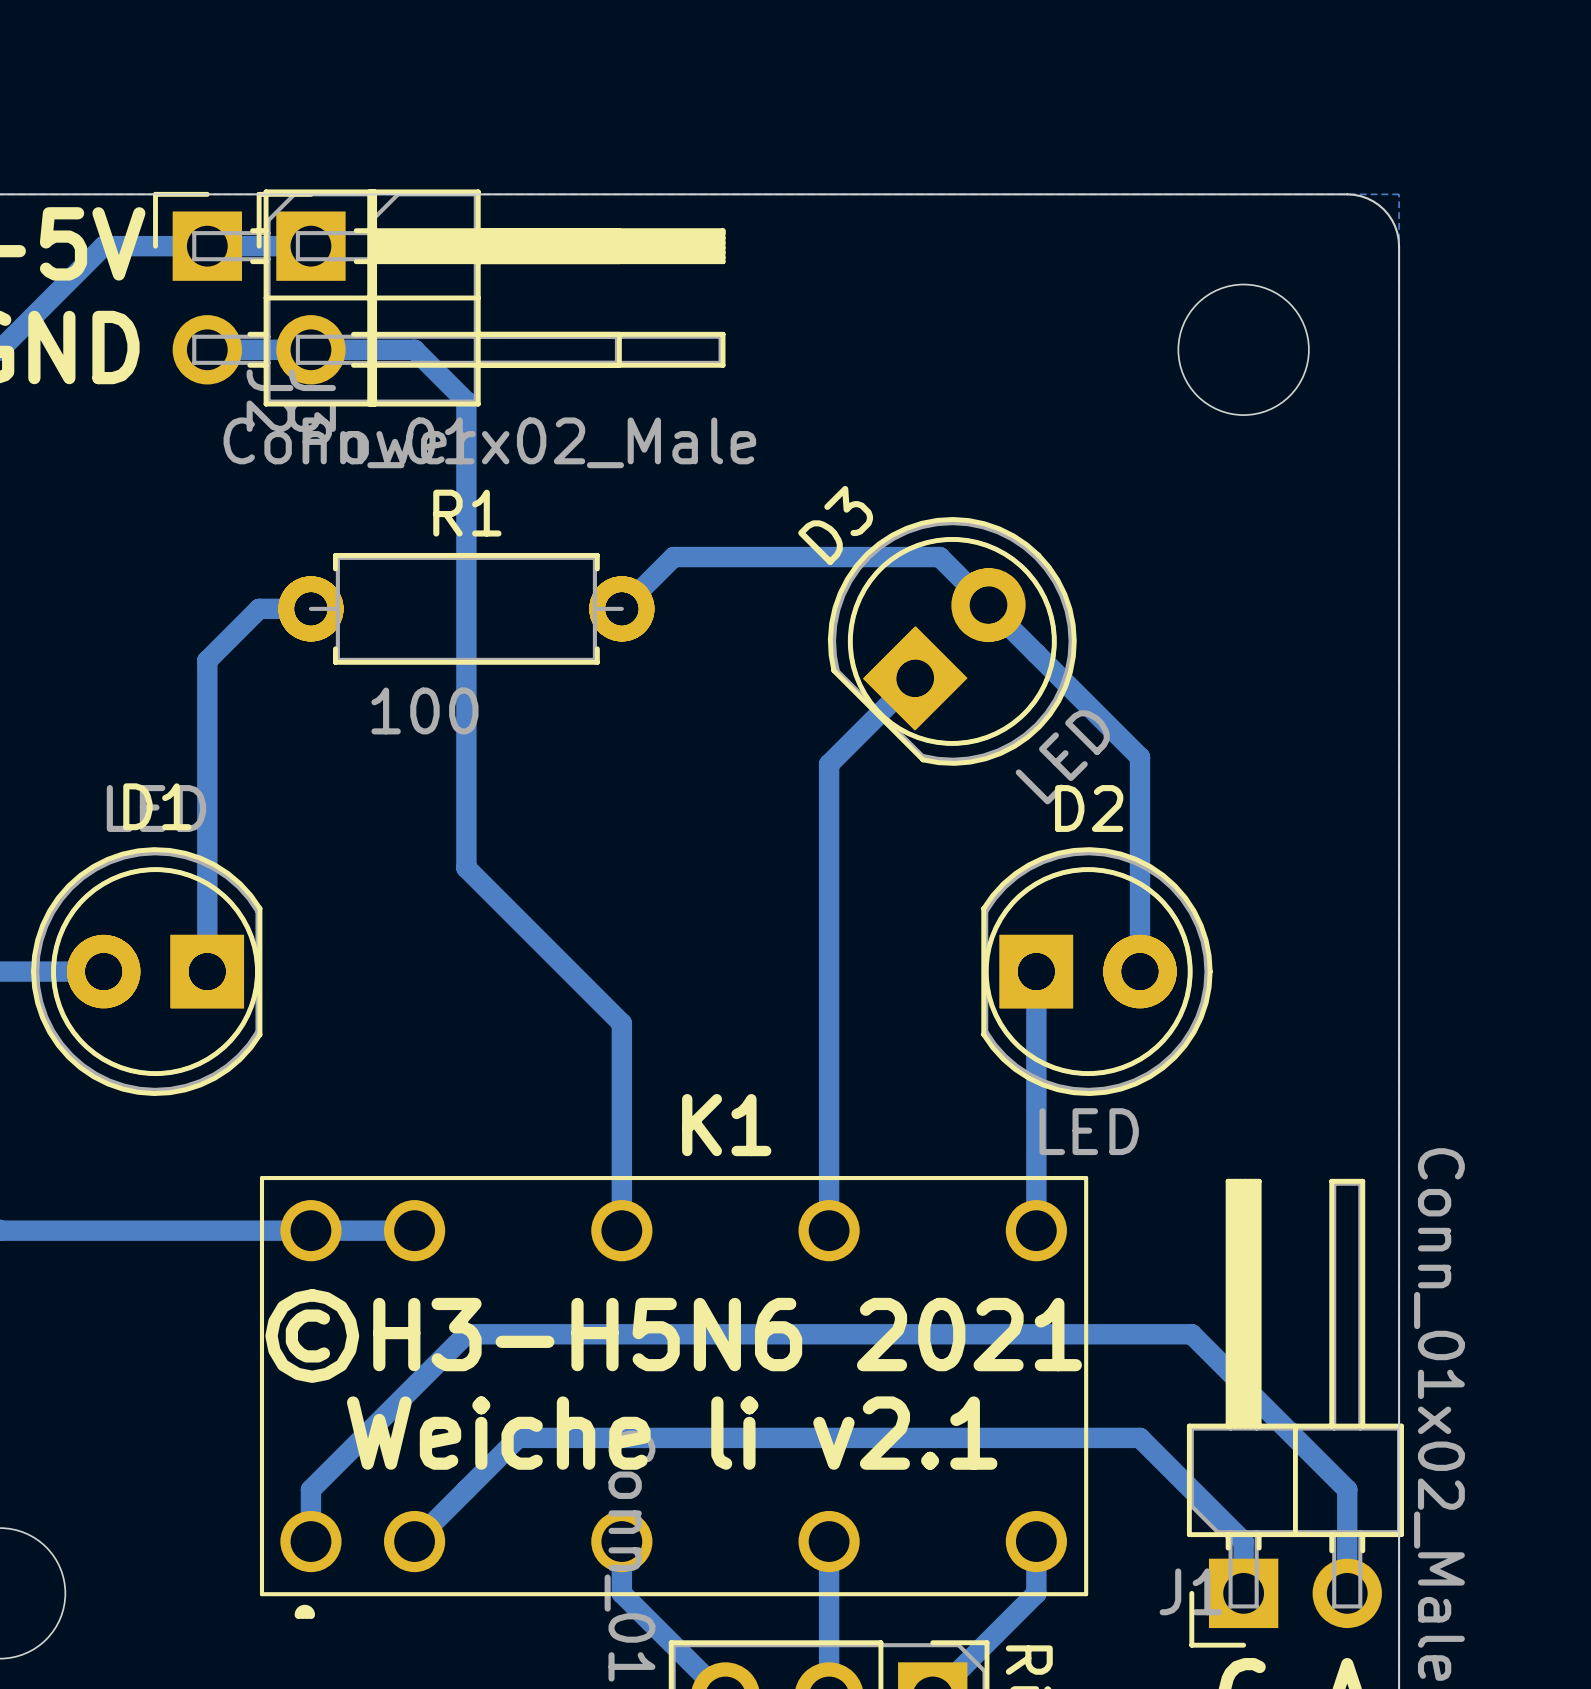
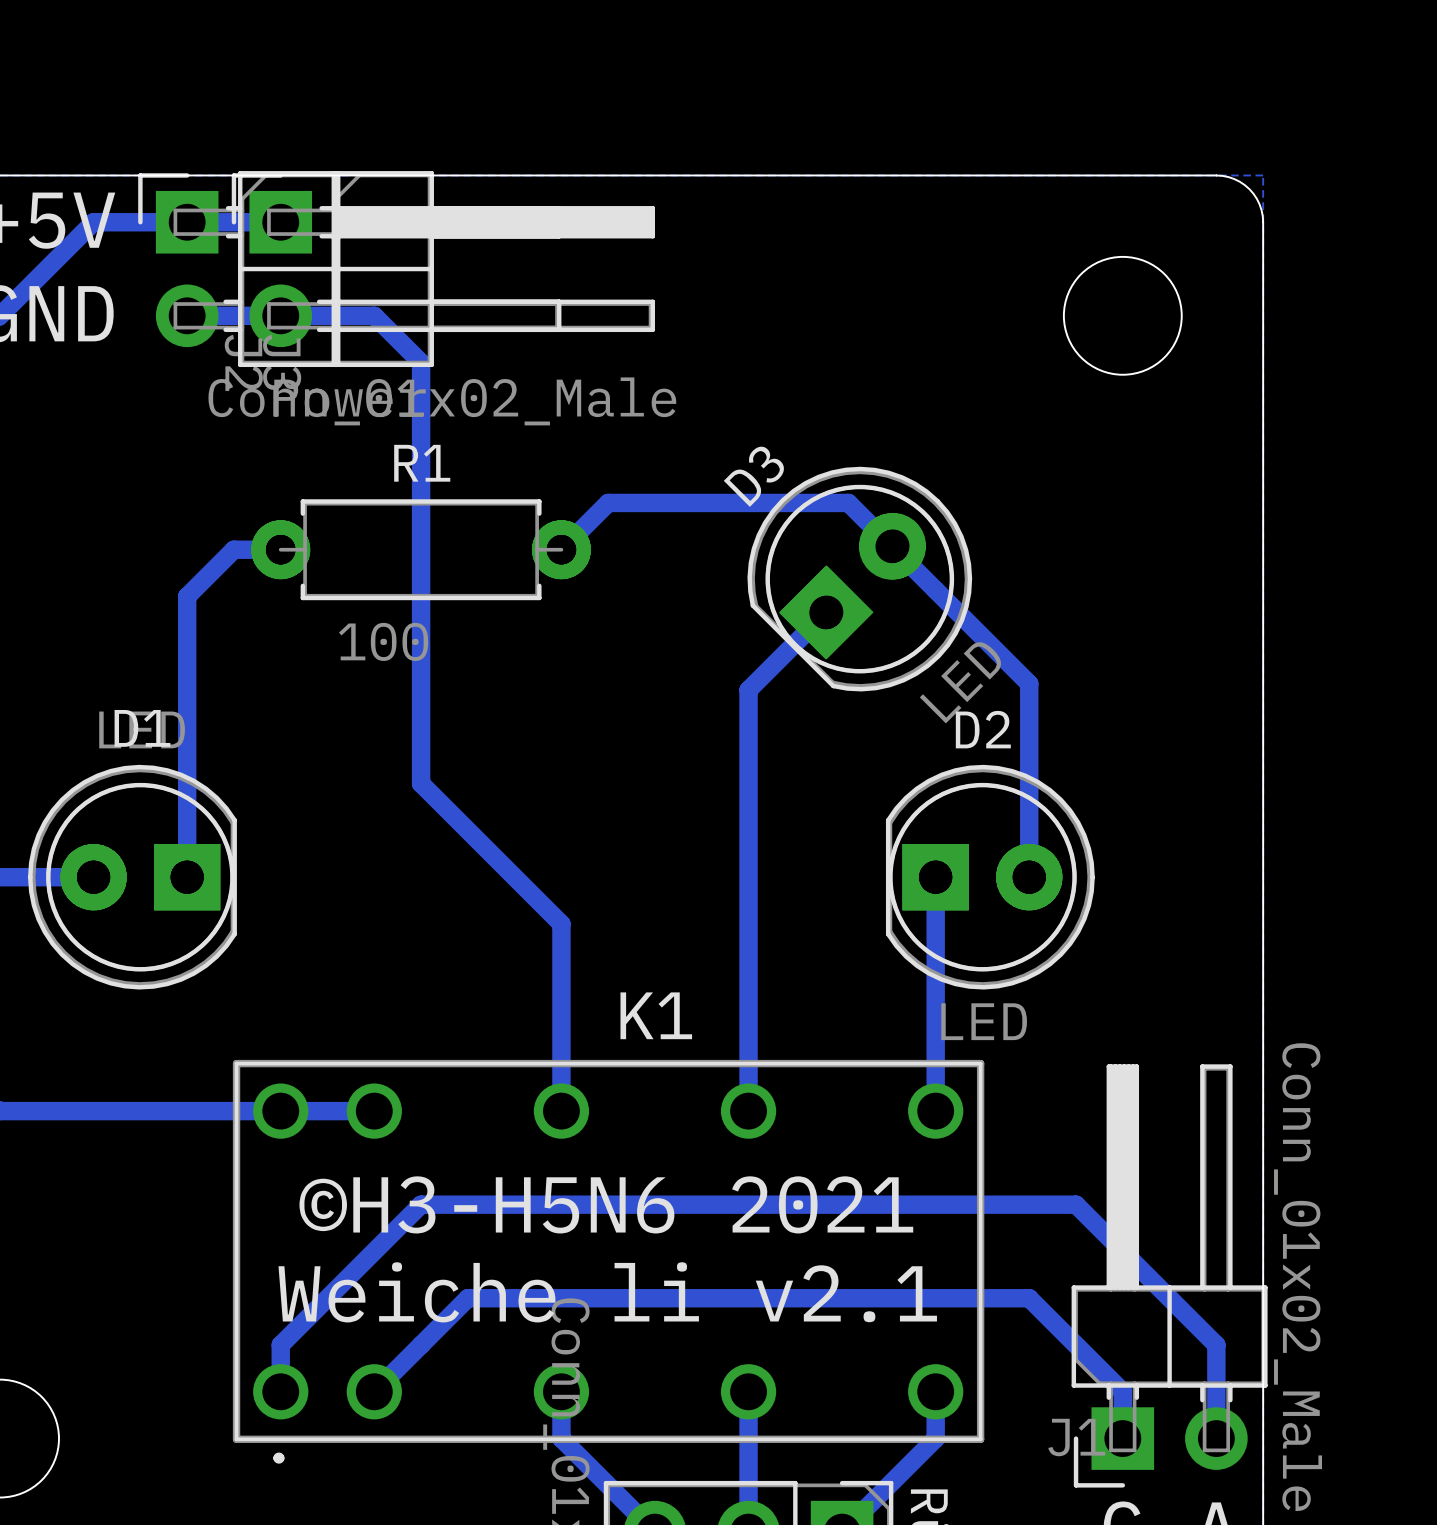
K1 footprint: [259, 1175, 1089, 1620] -> [232, 1059, 985, 1464]

